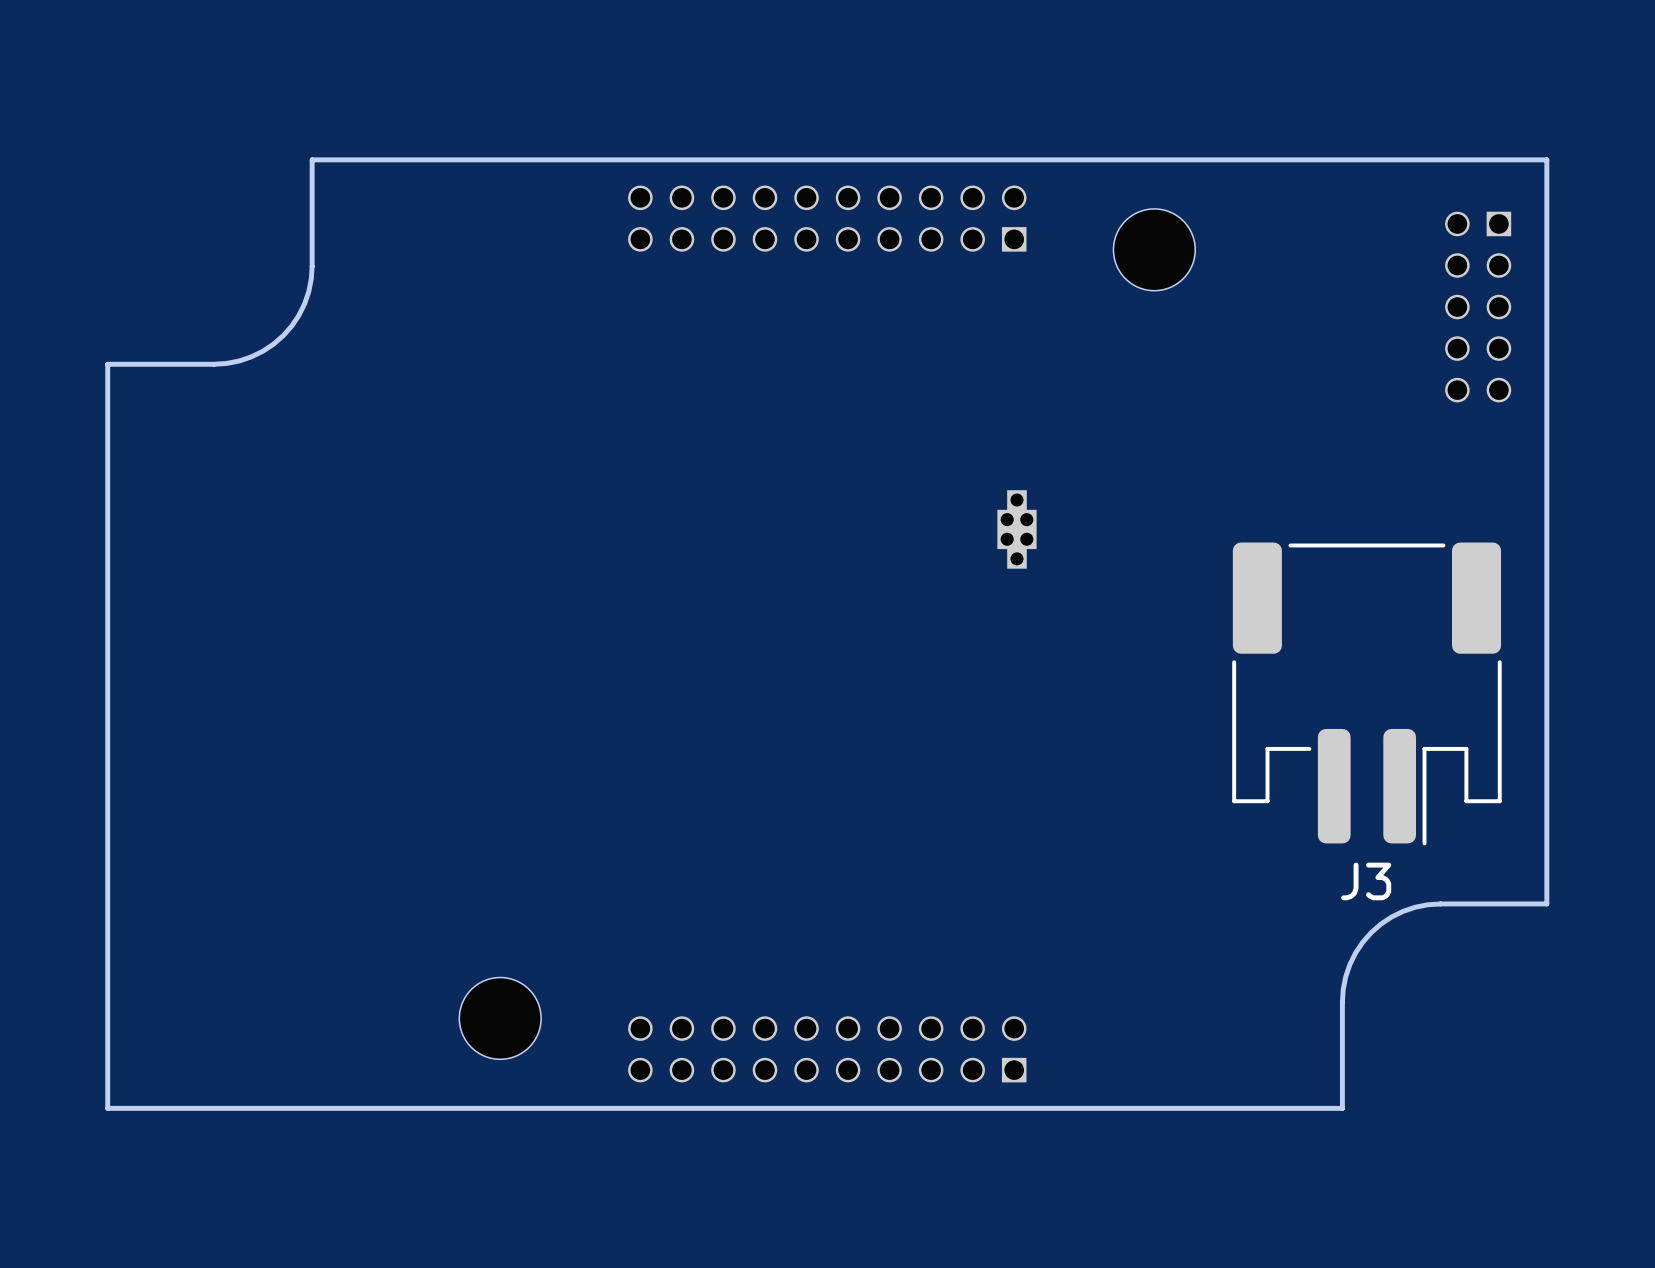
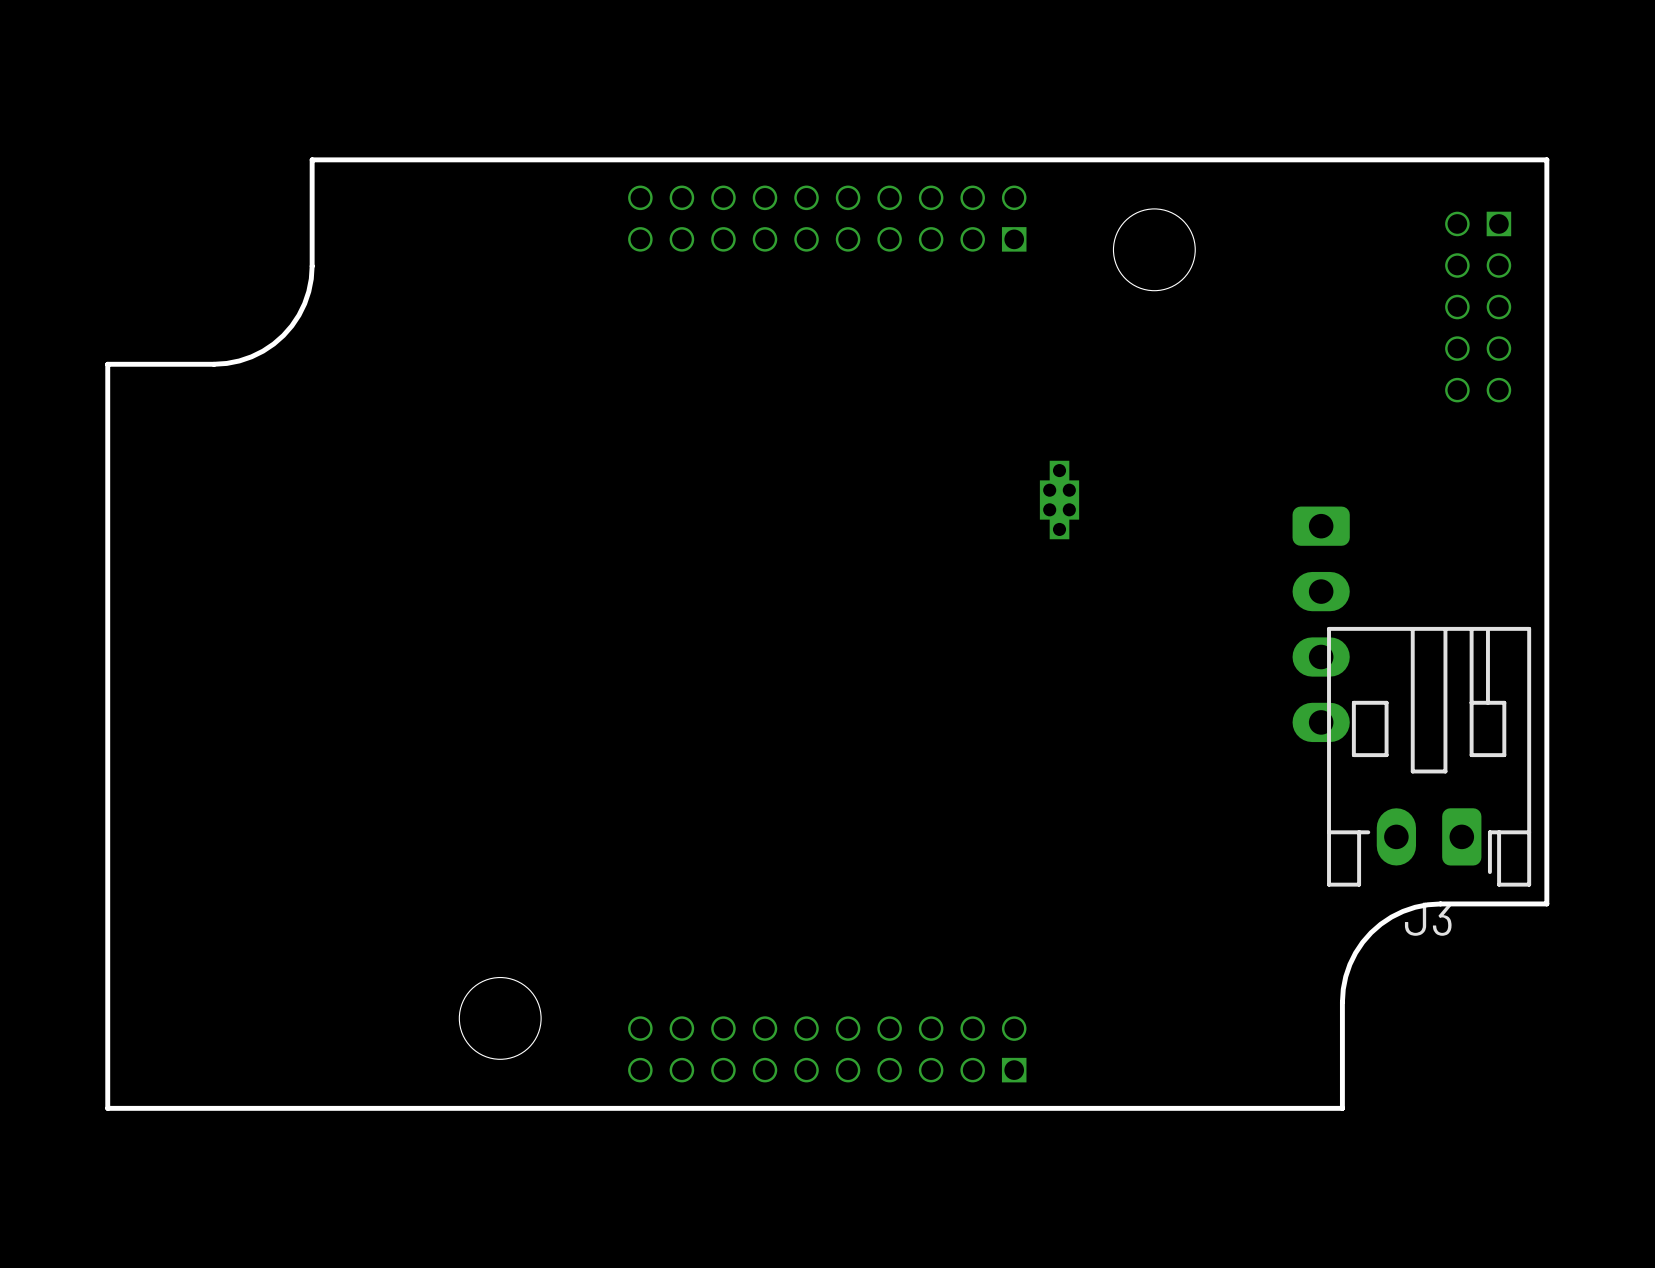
part position: (1016, 529) -> (1059, 500)
J3 footprint: [1232, 542, 1502, 846] -> [1327, 626, 1532, 887]
part: none -> (1321, 624)

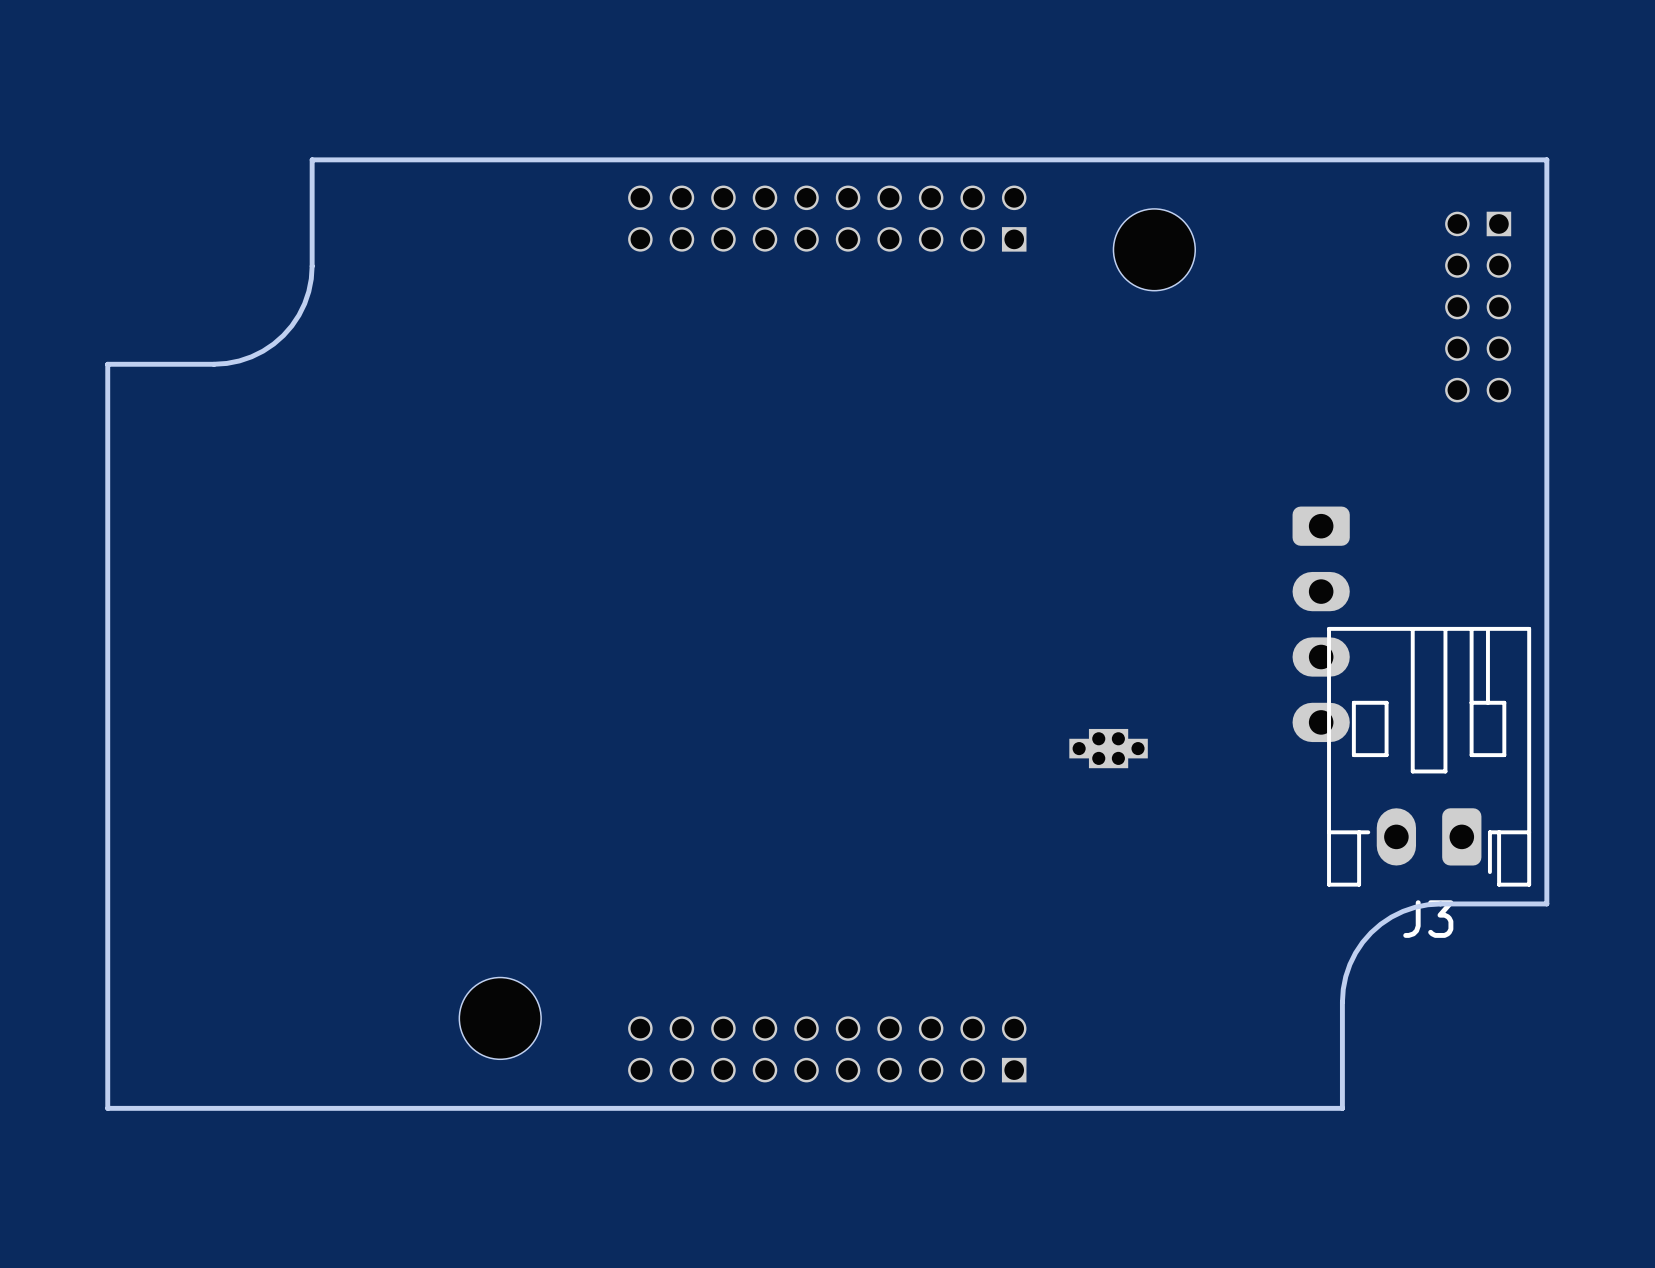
part rotation: 0° (1059, 500) -> 90° clockwise (1108, 748)
part position: (1059, 500) -> (1108, 748)

